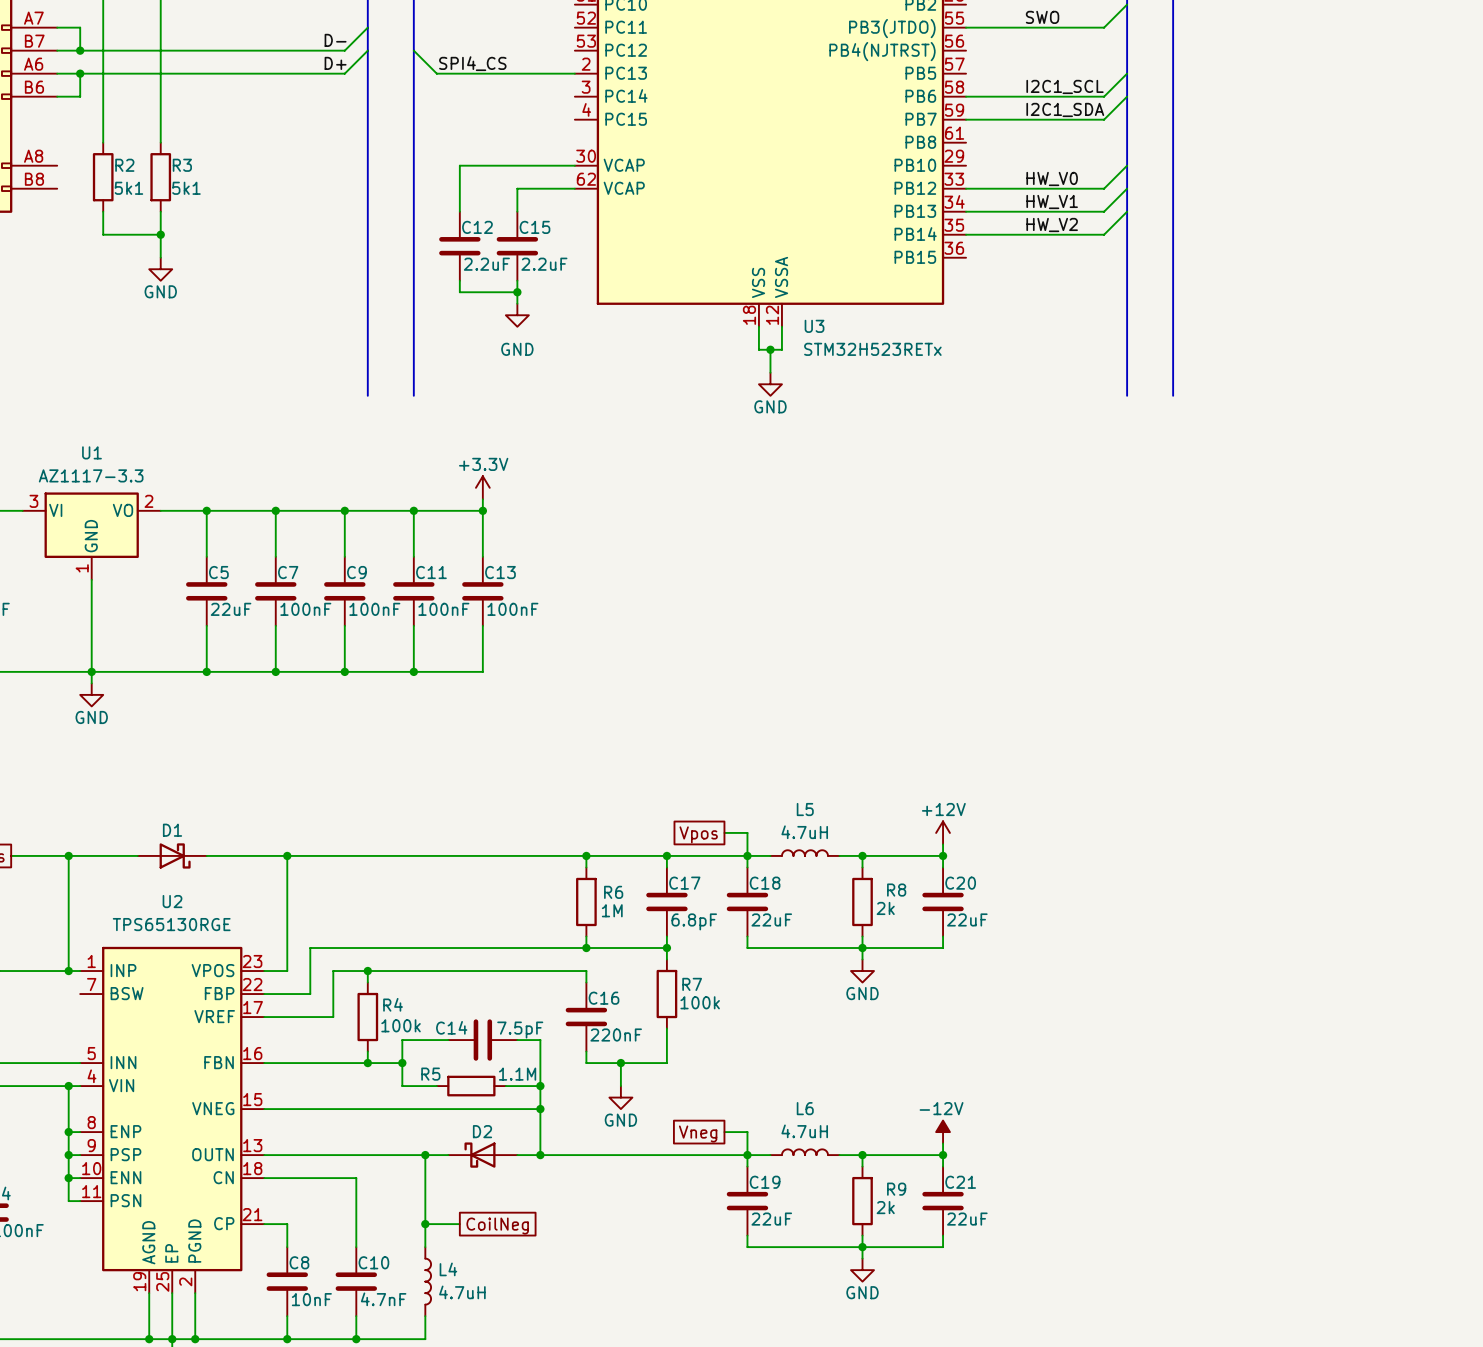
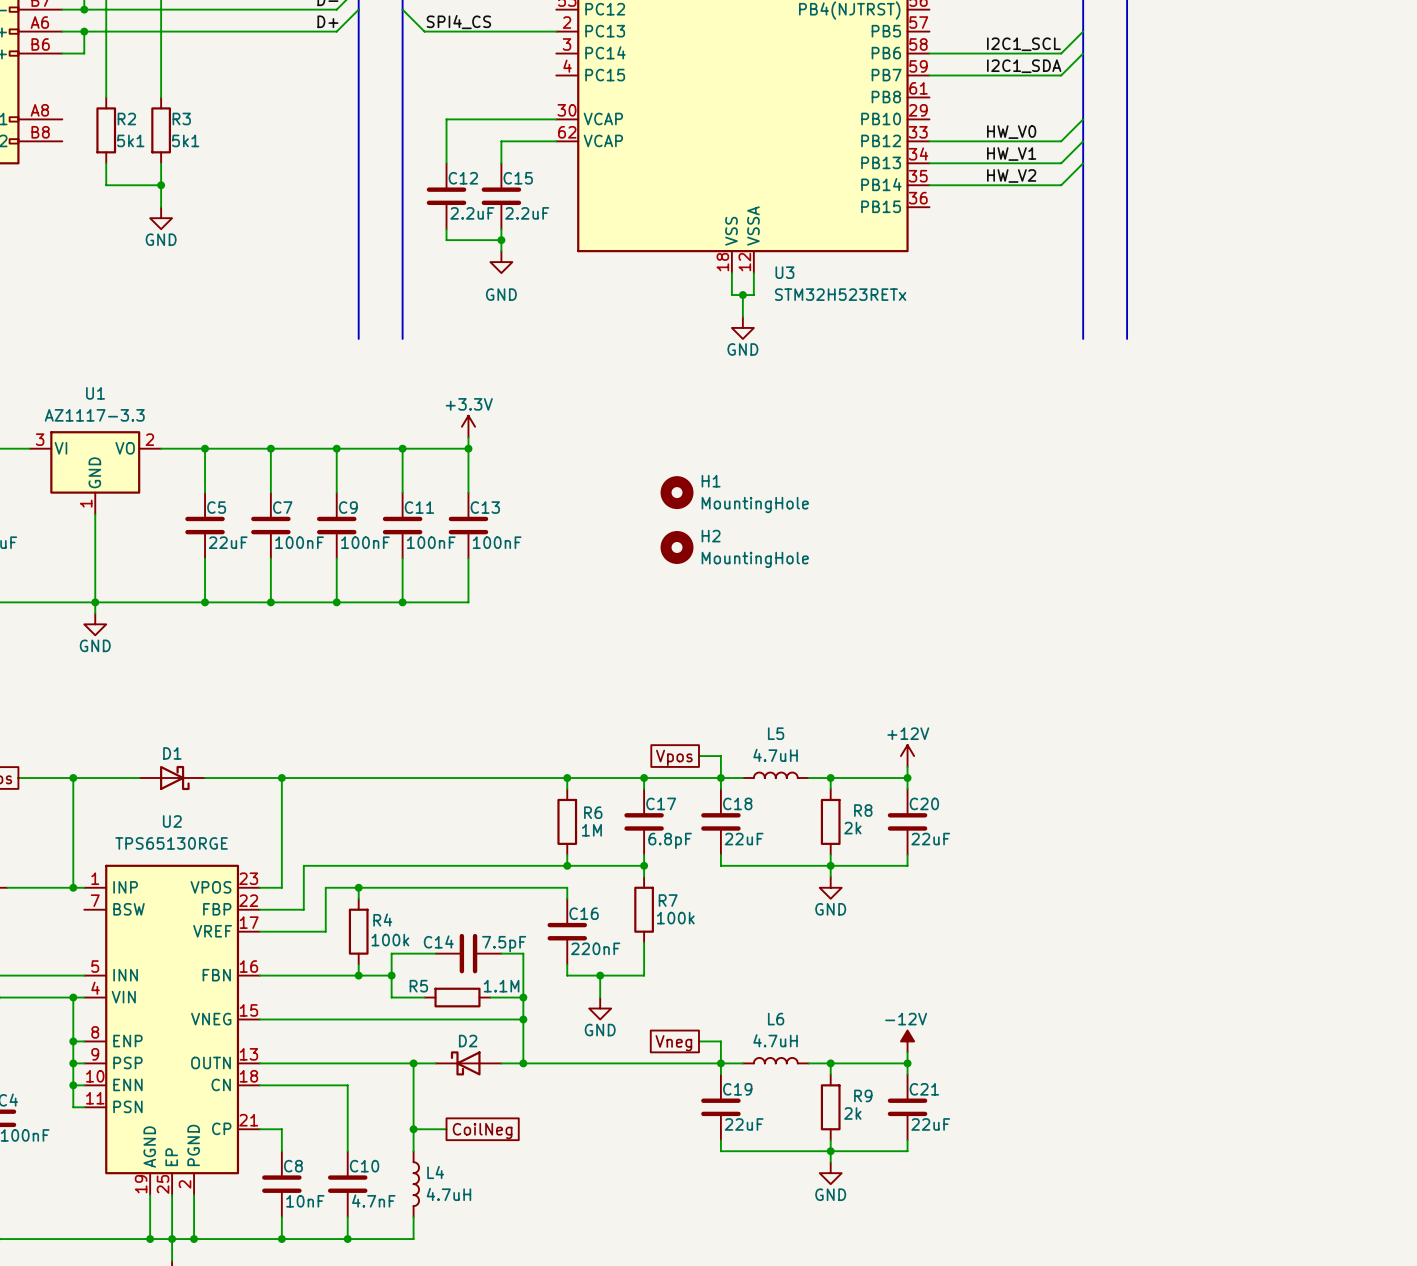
H1: none -> MountingHole (677, 492)
H2: none -> MountingHole (677, 547)

